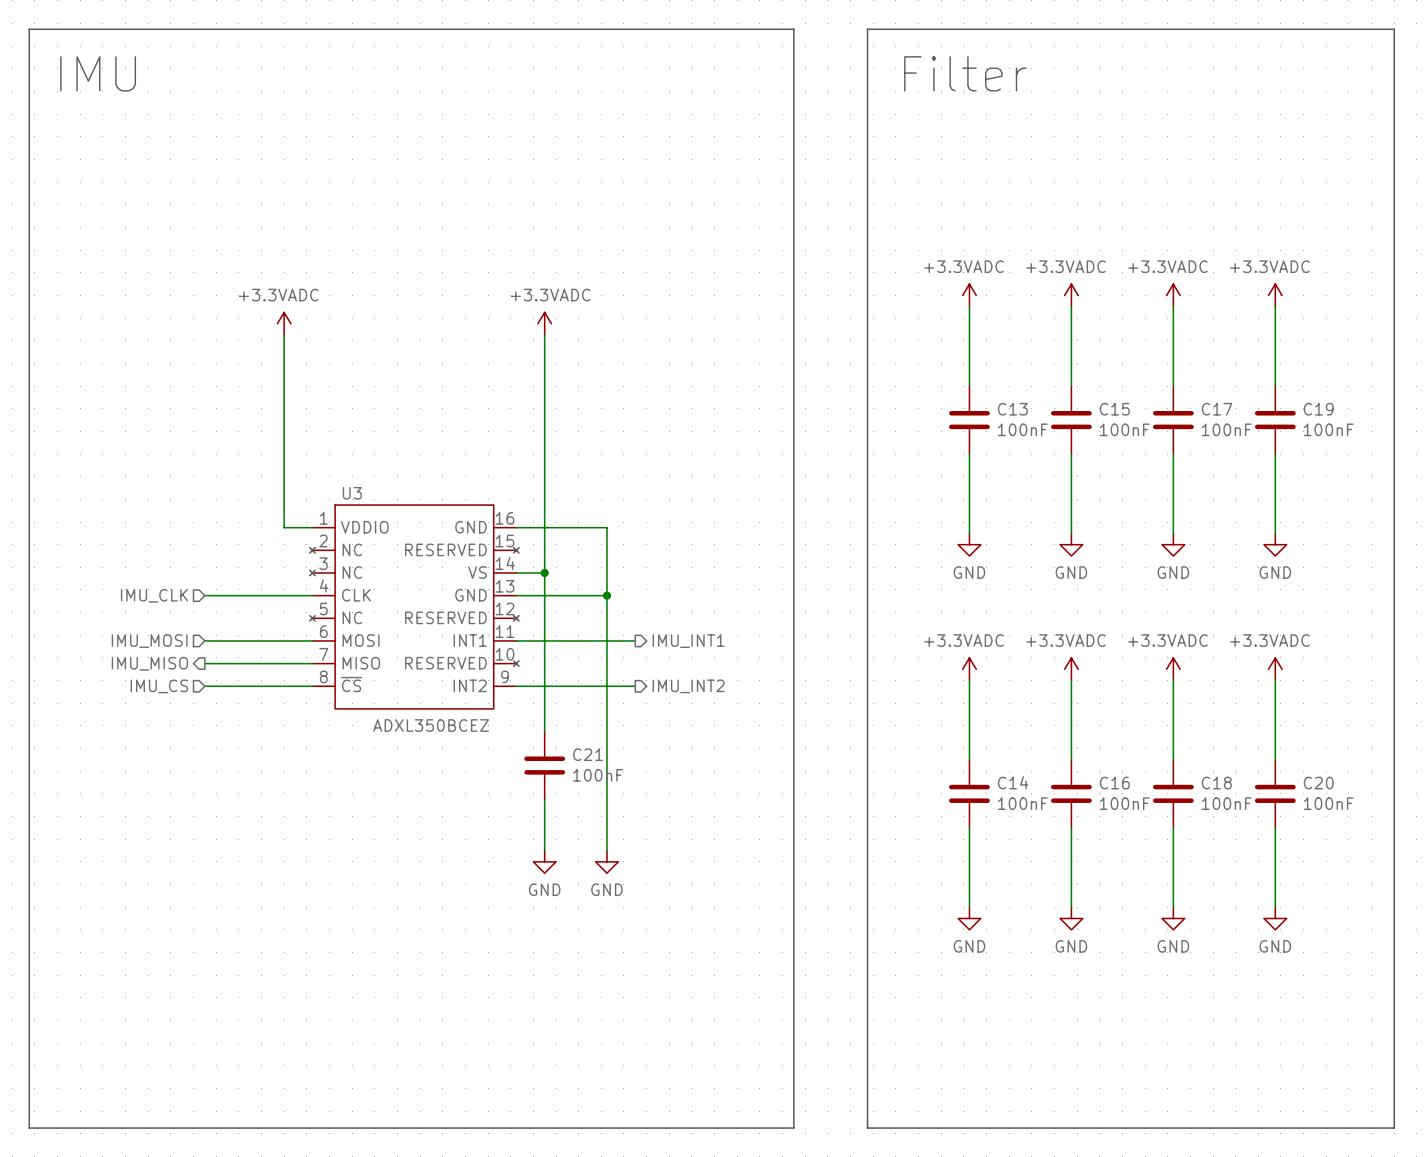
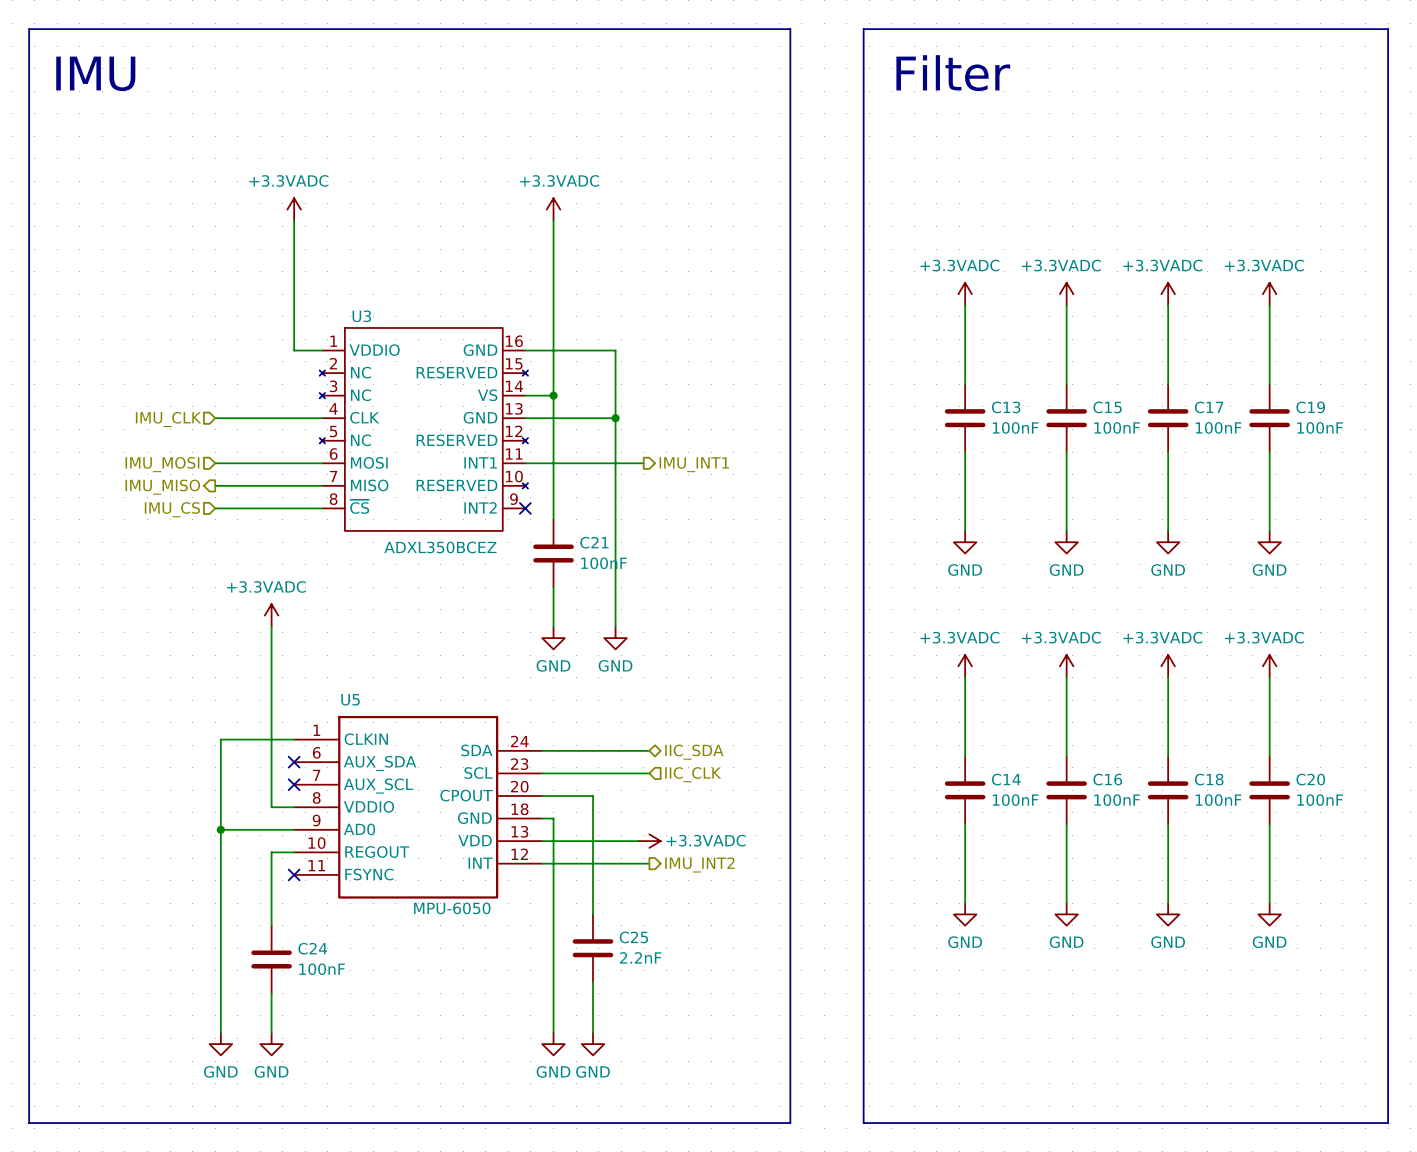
wire: none -> (294, 220) (294, 350) (322, 350)
wire: none -> (553, 220) (553, 519)
power symbol position: +3.3VADC (284, 323) -> +3.3VADC (294, 209)
power symbol position: +3.3VADC (544, 323) -> +3.3VADC (553, 209)
wire: (284, 335) (284, 527) (312, 527) -> none
wire: (544, 335) (544, 731) -> none
wire: none -> (525, 350) (615, 350) (615, 626)
junction: none -> (553, 395)
junction: none -> (615, 418)
no-connect mark: none -> (525, 508)
wire: (516, 527) (606, 527) (606, 850) -> none
wire: (516, 572) (544, 572) -> (525, 395) (553, 395)
junction: (544, 572) -> none
wire: none -> (553, 587) (553, 626)
hierarchical label position: IMU_CLK (154, 595) -> IMU_CLK (168, 419)
wire: (204, 595) (312, 595) -> (215, 418) (322, 418)
wire: (516, 595) (606, 595) -> (525, 418) (615, 418)
junction: (606, 595) -> none
U3 position: (414, 606) -> (423, 429)
power symbol: none -> +3.3VADC (271, 615)
wire: none -> (271, 626) (271, 807) (294, 807)
wire: (204, 640) (312, 640) -> (215, 463) (322, 463)
wire: (516, 640) (635, 640) -> (525, 463) (643, 463)
power symbol: none -> GND (553, 638)
power symbol: none -> GND (615, 638)
hierarchical label position: IMU_MOSI (149, 641) -> IMU_MOSI (162, 464)
hierarchical label position: IMU_INT1 (688, 641) -> IMU_INT1 (694, 464)
hierarchical label position: IMU_MISO (149, 663) -> IMU_MISO (162, 487)
wire: (204, 663) (312, 663) -> (215, 485) (322, 485)
hierarchical label position: IMU_CS (159, 686) -> IMU_CS (172, 509)
wire: (204, 686) (312, 686) -> (215, 508) (322, 508)
wire: (516, 686) (635, 686) -> none
hierarchical label position: IMU_INT2 (688, 686) -> IMU_INT2 (699, 864)
wire: none -> (294, 739) (220, 739) (220, 1032)
wire: none -> (542, 750) (649, 750)
hierarchical label: none -> IIC_SDA (694, 752)
no-connect mark: none -> (294, 762)
C21 position: (544, 765) -> (553, 553)
wire: none -> (542, 773) (649, 773)
hierarchical label: none -> IIC_CLK (693, 774)
no-connect mark: none -> (294, 784)
wire: (544, 799) (544, 850) -> (542, 795) (593, 795) (593, 914)
U5: none -> MPU-6050 (418, 807)
wire: none -> (542, 818) (553, 818) (553, 1032)
wire: none -> (220, 829) (294, 829)
junction: none -> (220, 829)
wire: none -> (542, 841) (638, 841)
power symbol: none -> +3.3VADC (649, 841)
wire: none -> (294, 852) (271, 852) (271, 925)
power symbol: GND (544, 861) -> none
power symbol: GND (606, 861) -> none
wire: none -> (542, 863) (649, 863)
no-connect mark: none -> (294, 874)
C25: none -> 2.2nF (593, 948)
C24: none -> 100nF (271, 959)
wire: none -> (593, 982) (593, 1032)
wire: none -> (271, 993) (271, 1032)
power symbol: none -> GND (220, 1044)
power symbol: none -> GND (271, 1044)
power symbol: none -> GND (553, 1044)
power symbol: none -> GND (593, 1044)

